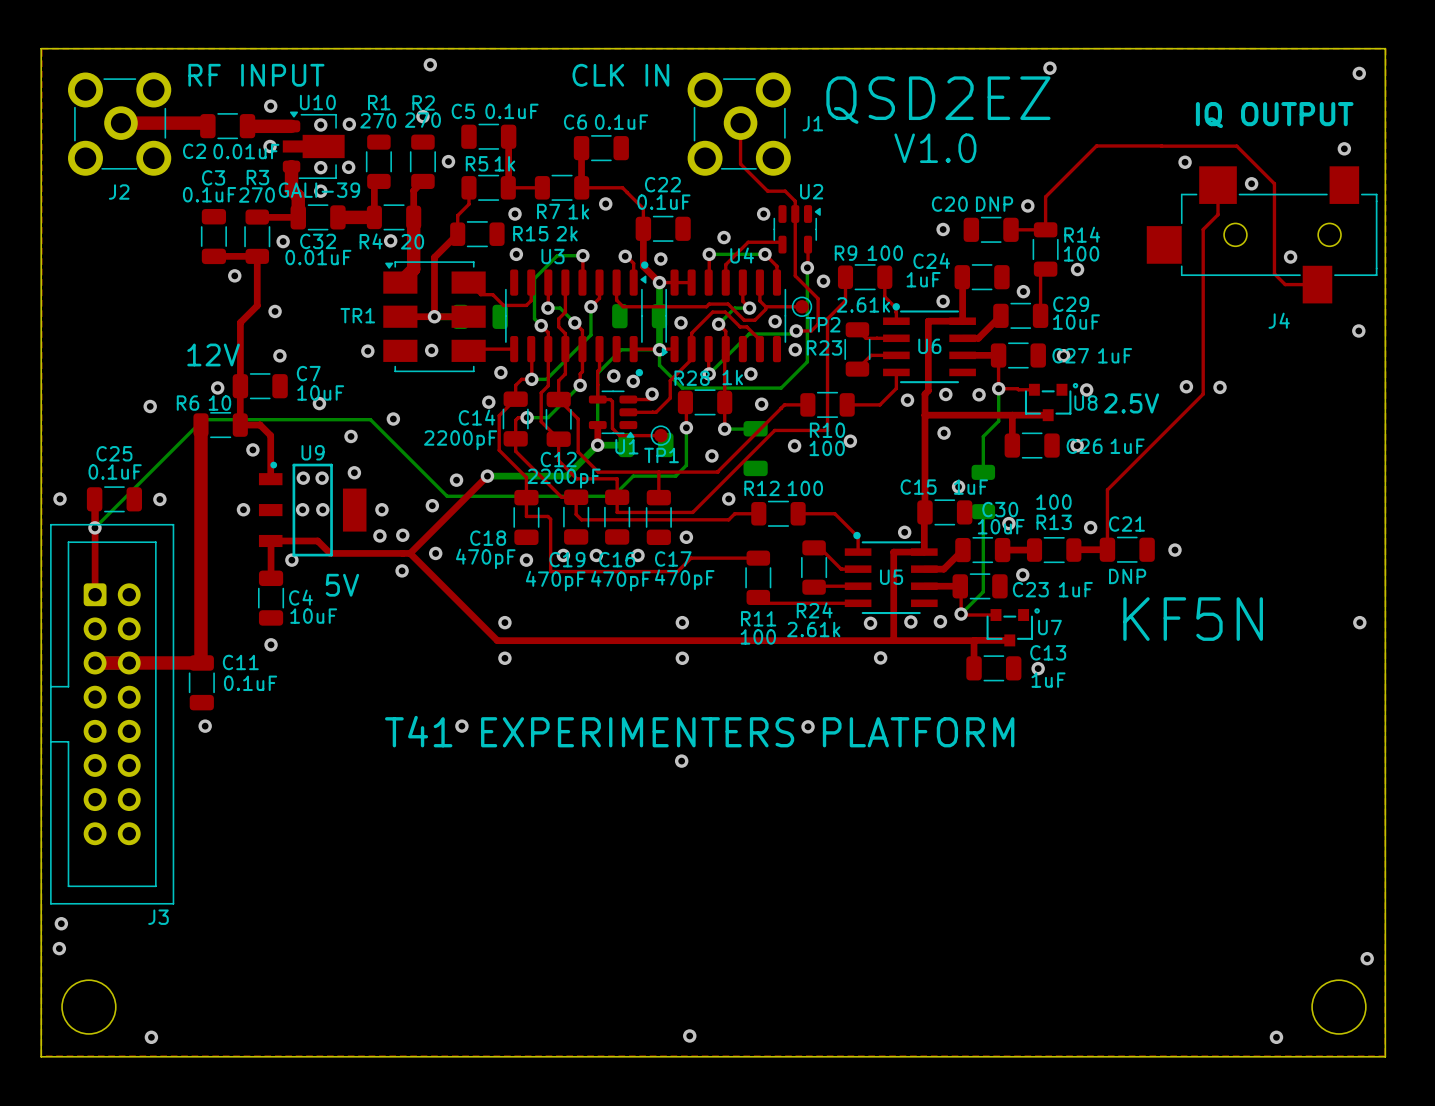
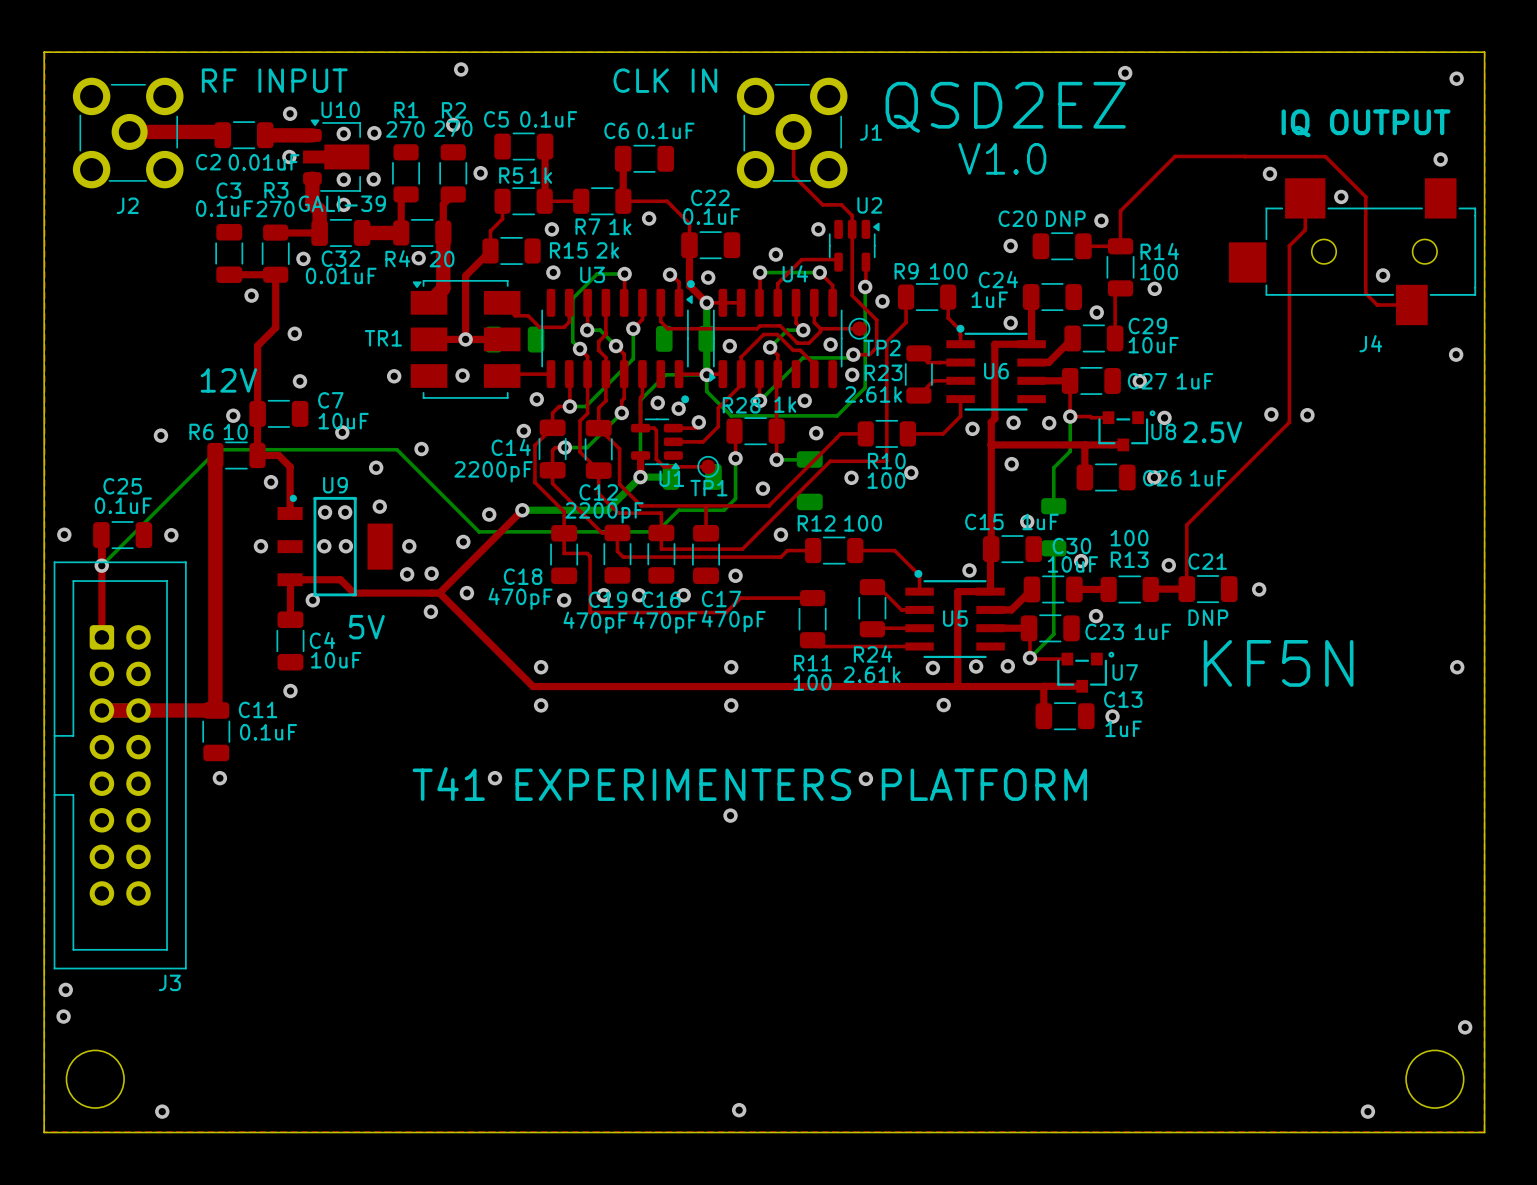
R23 value position: 2.61k (863, 304) -> 2.61k (873, 394)

